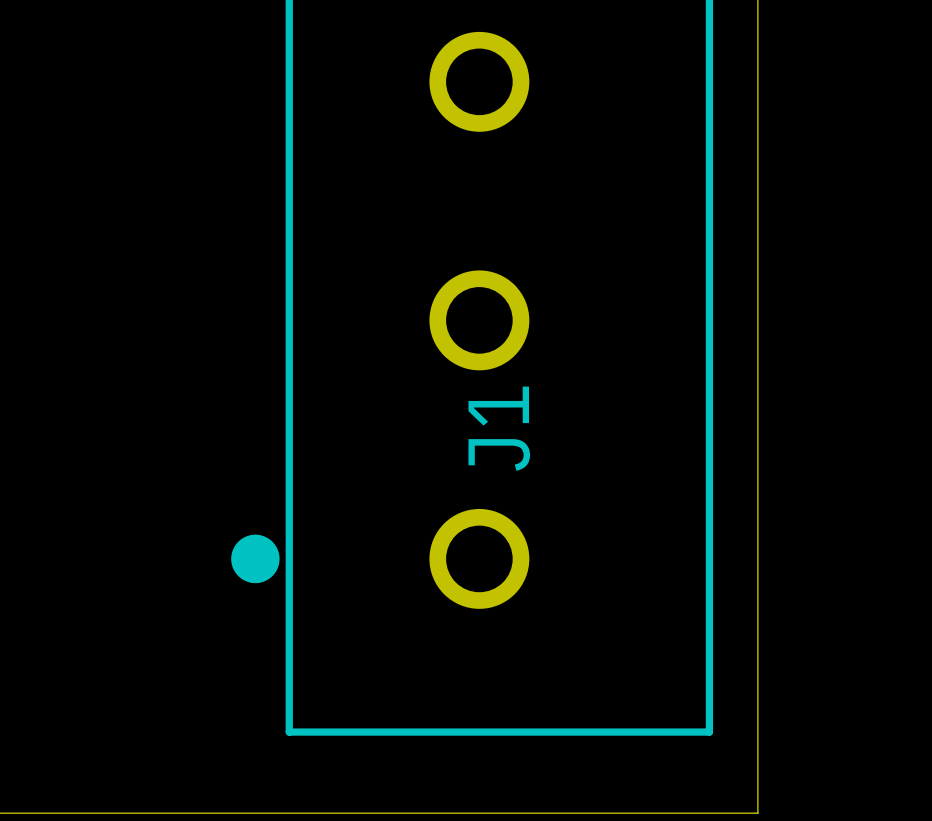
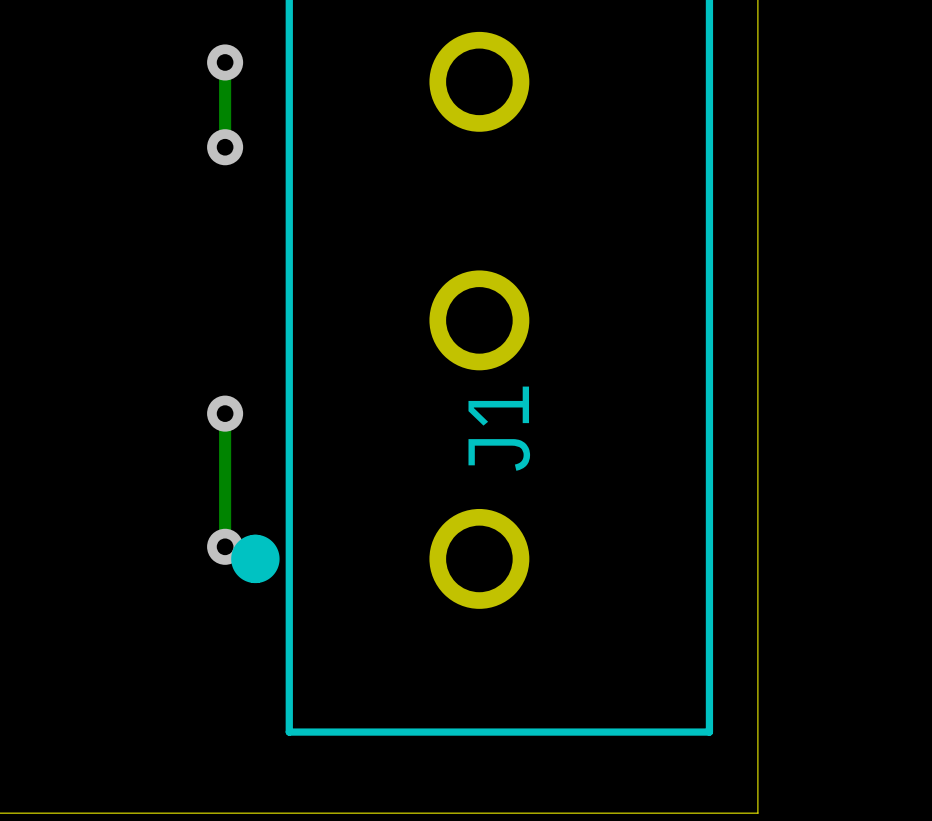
track: none -> (225, 62) (225, 147)
via: none -> (225, 62)
via: none -> (225, 147)
track: none -> (225, 413) (225, 546)
via: none -> (225, 413)
via: none -> (225, 546)

